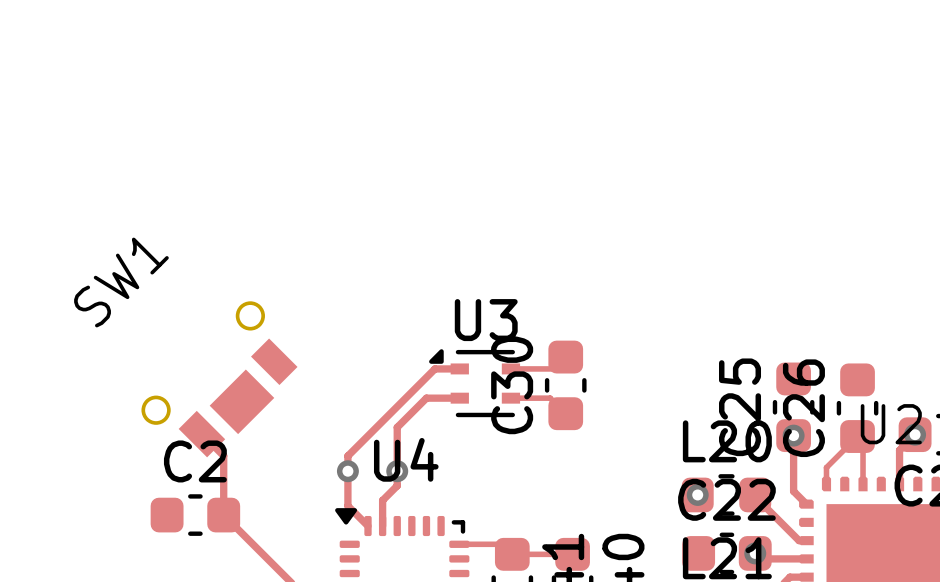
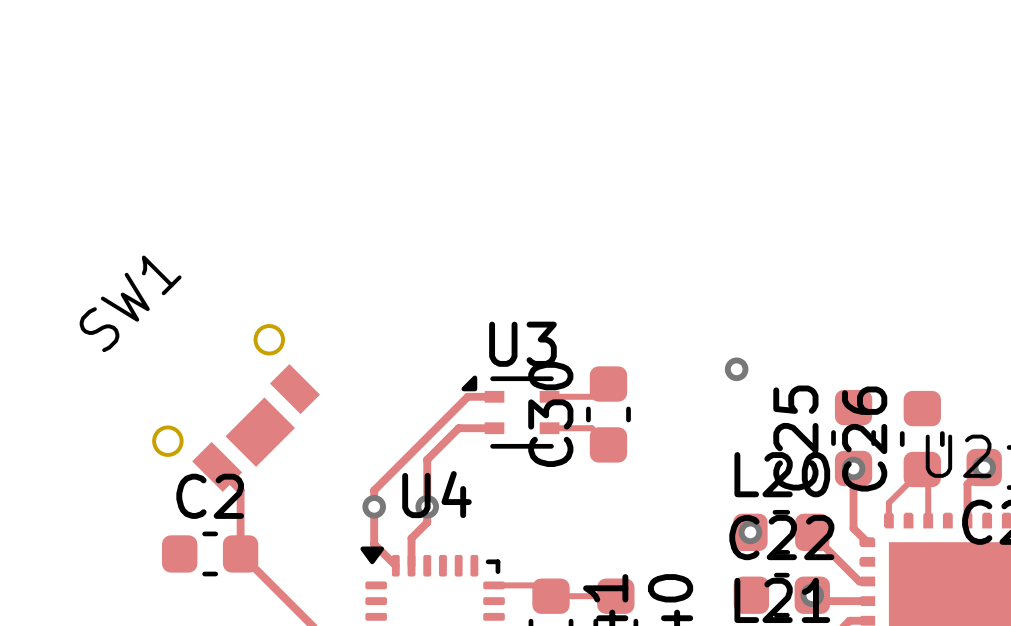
via: none -> (736, 369)

